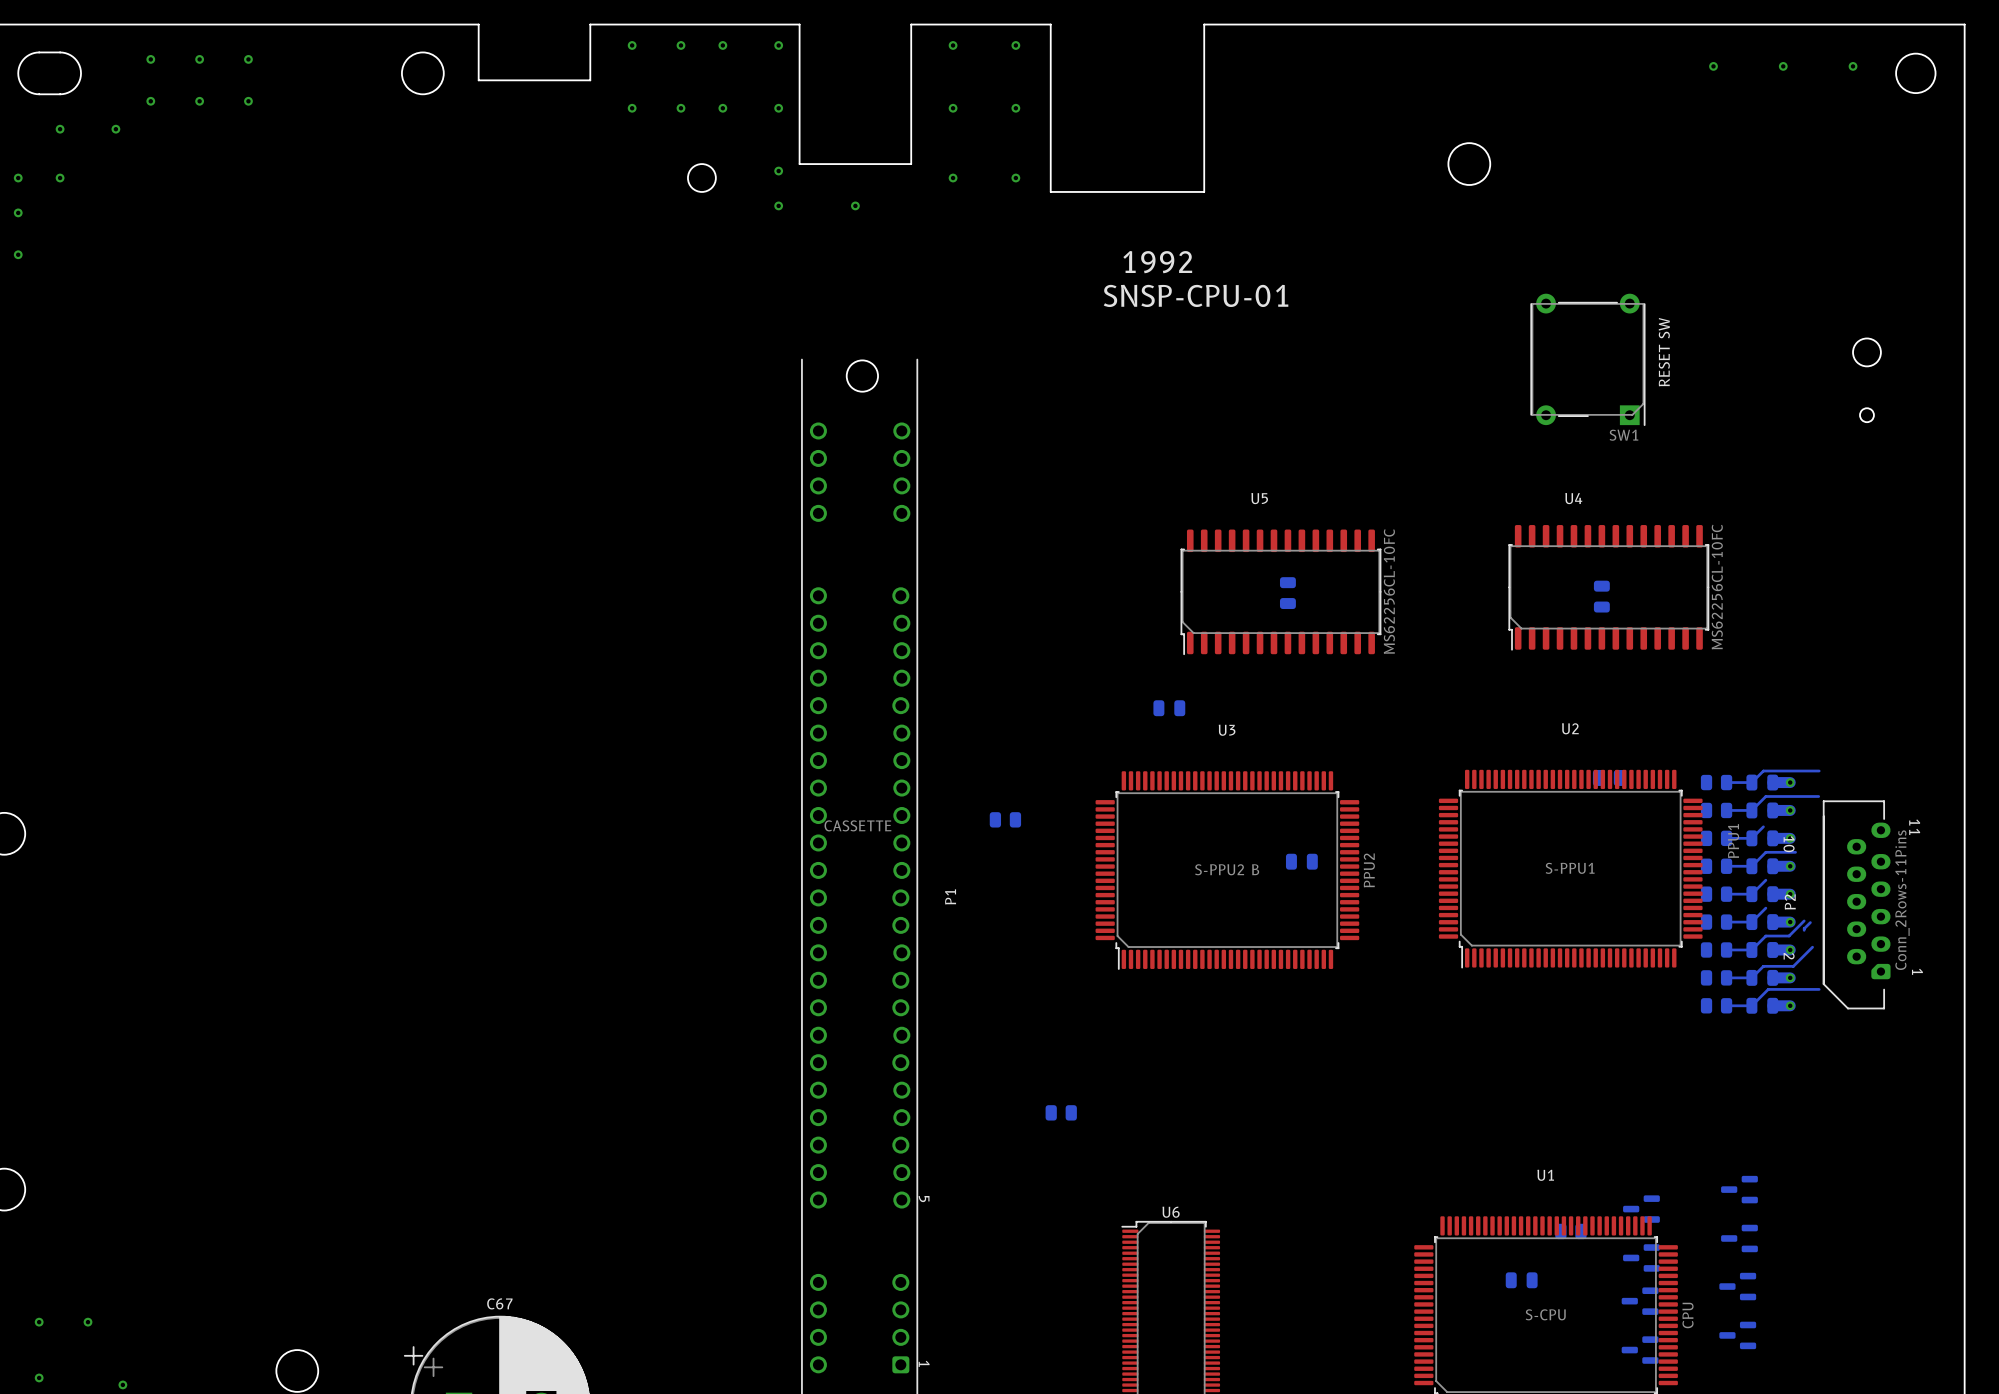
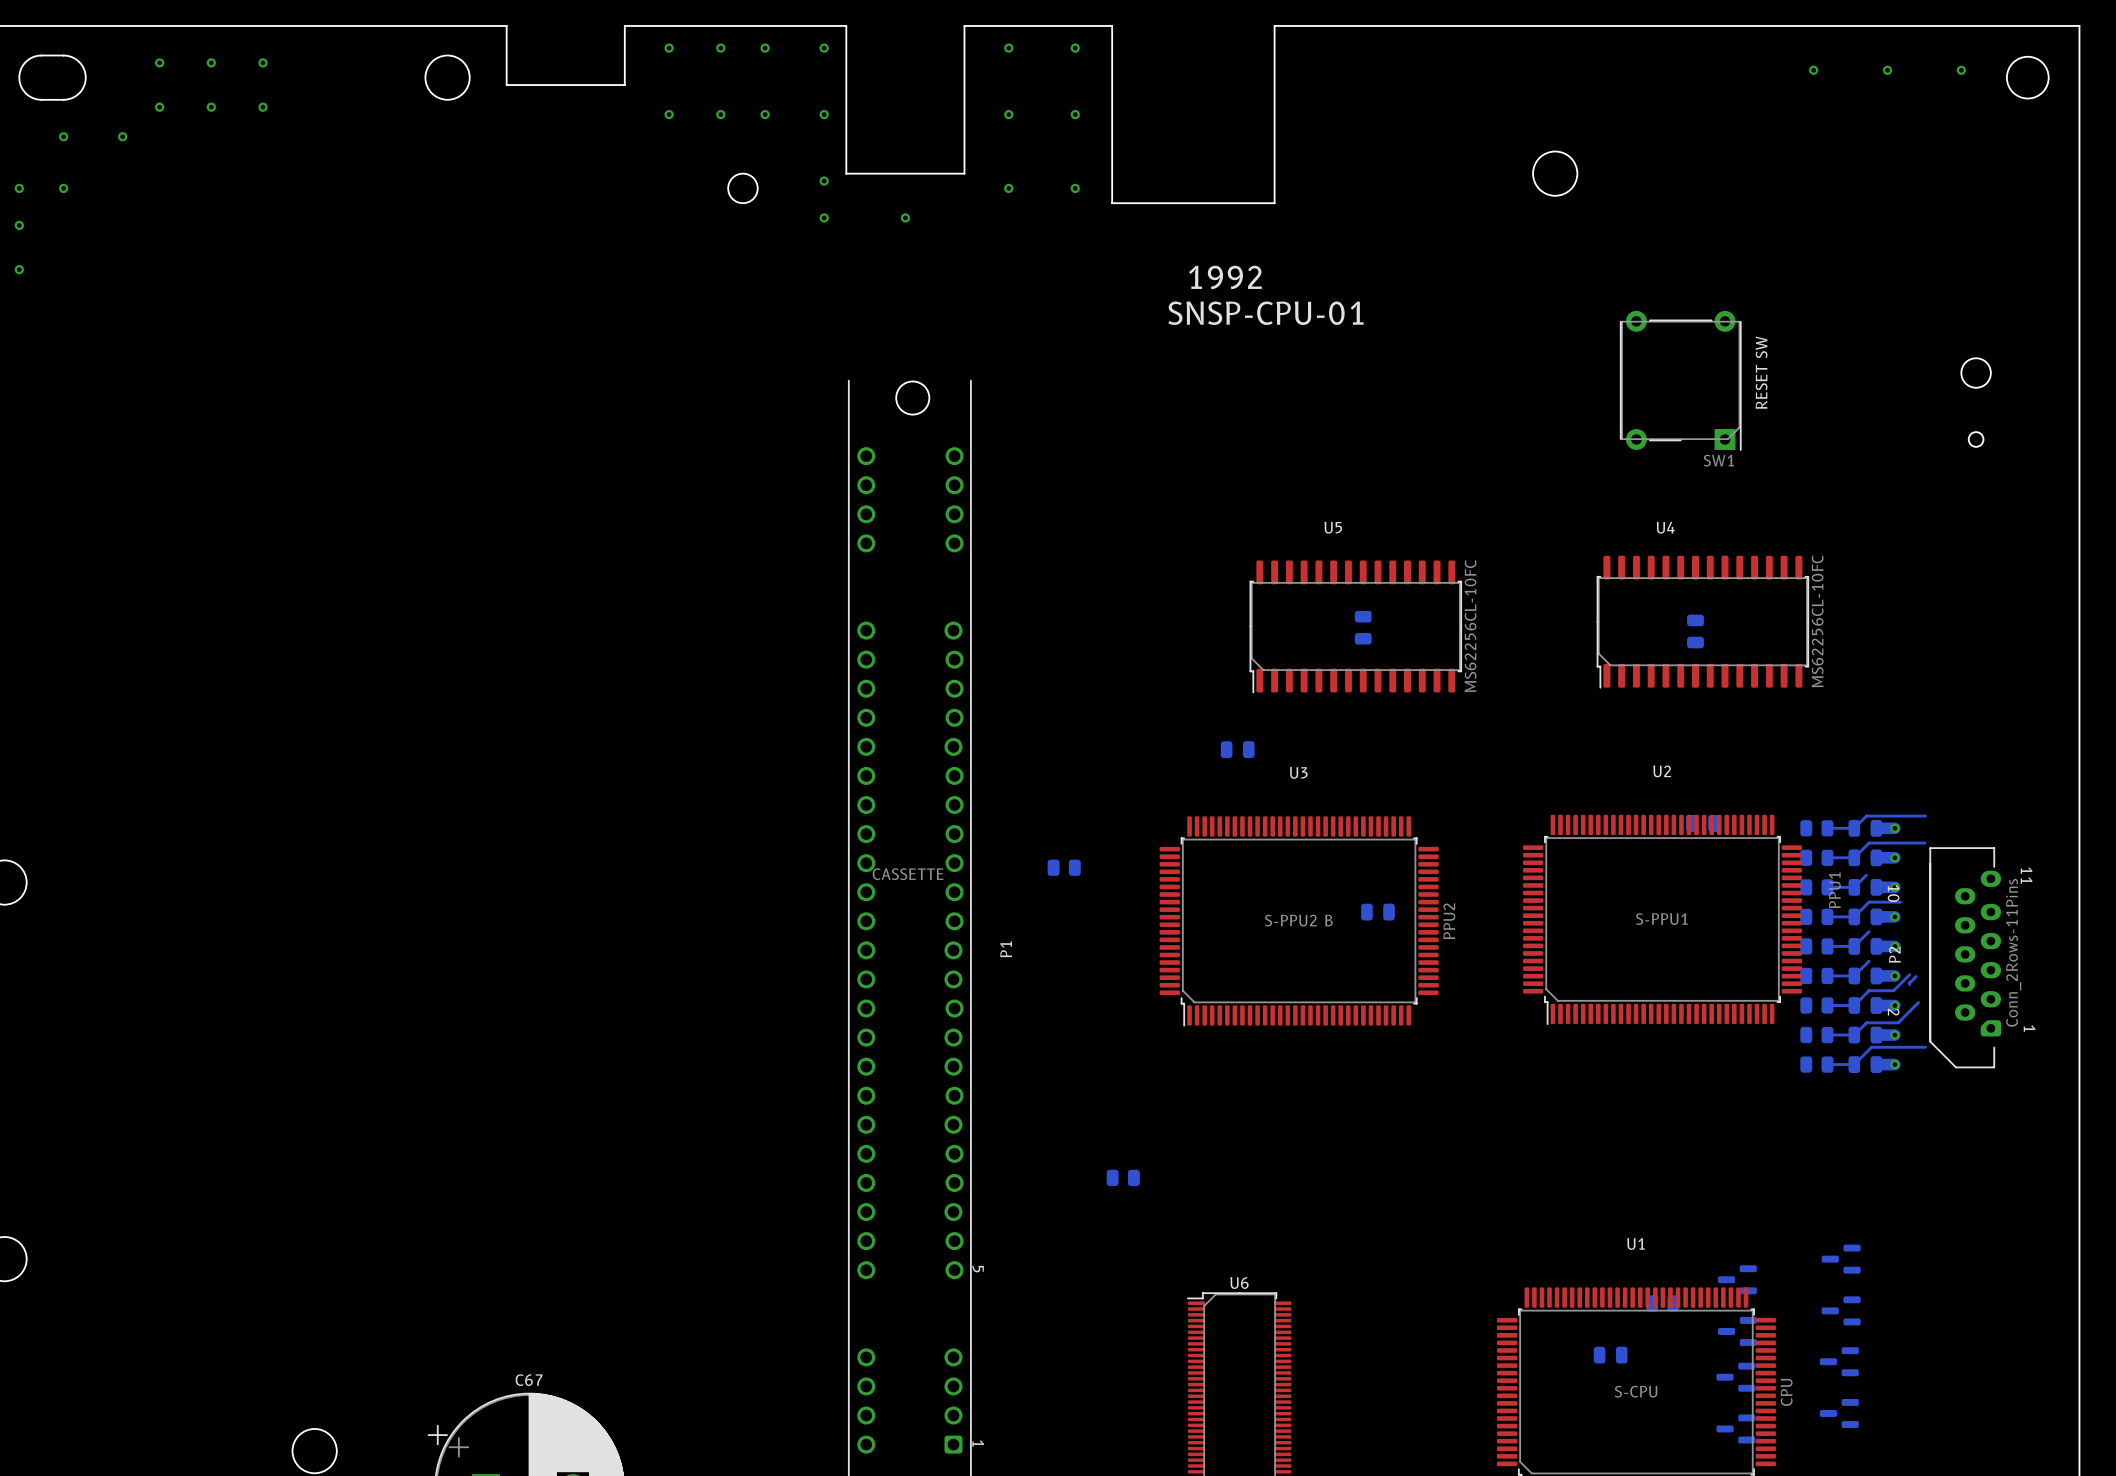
via: (39, 1322) -> none
via: (88, 1322) -> none
via: (39, 1377) -> none
via: (122, 1384) -> none

